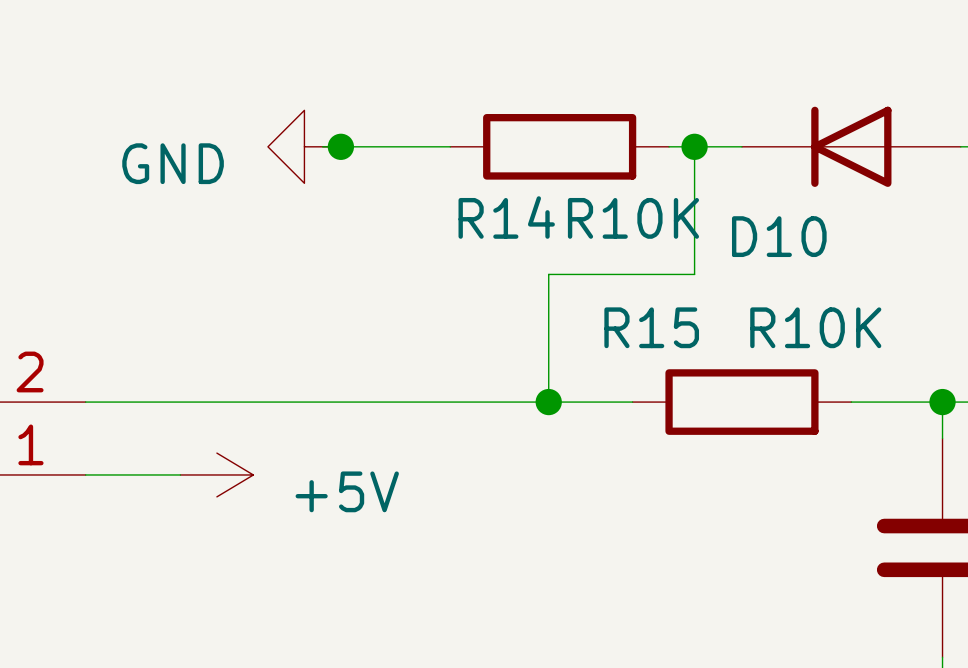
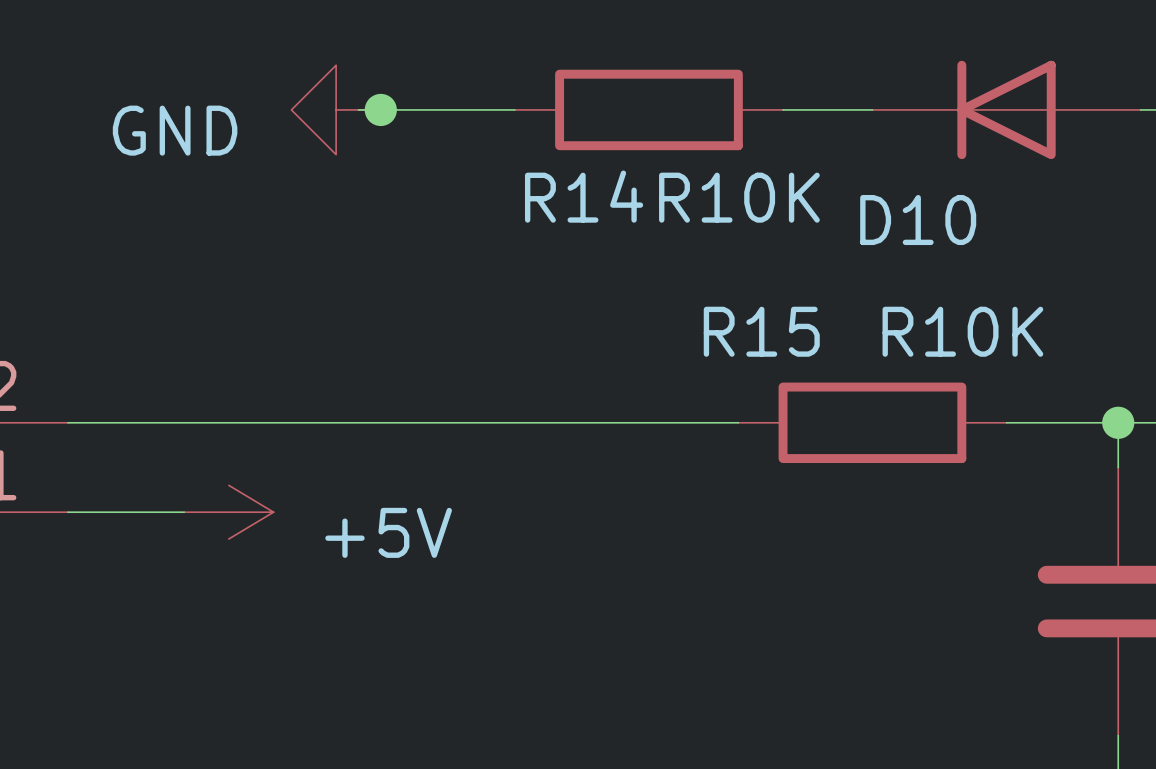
wire: (694, 146) (694, 274) (548, 274) (548, 402) -> none
junction: (694, 146) -> none
junction: (548, 402) -> none

